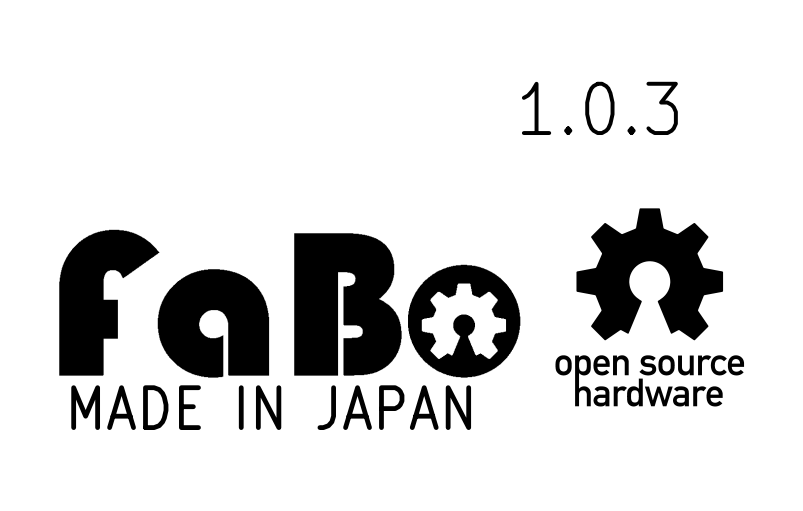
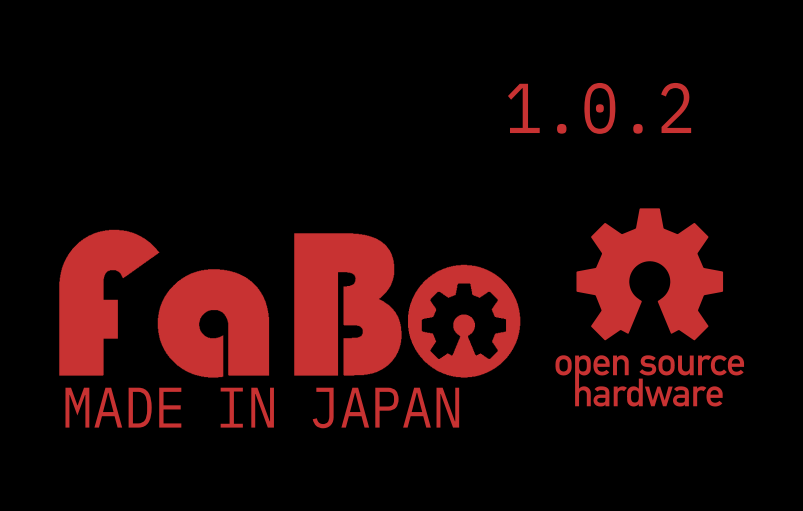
text: 1.0.3 (599, 108) -> 1.0.2 (599, 108)

